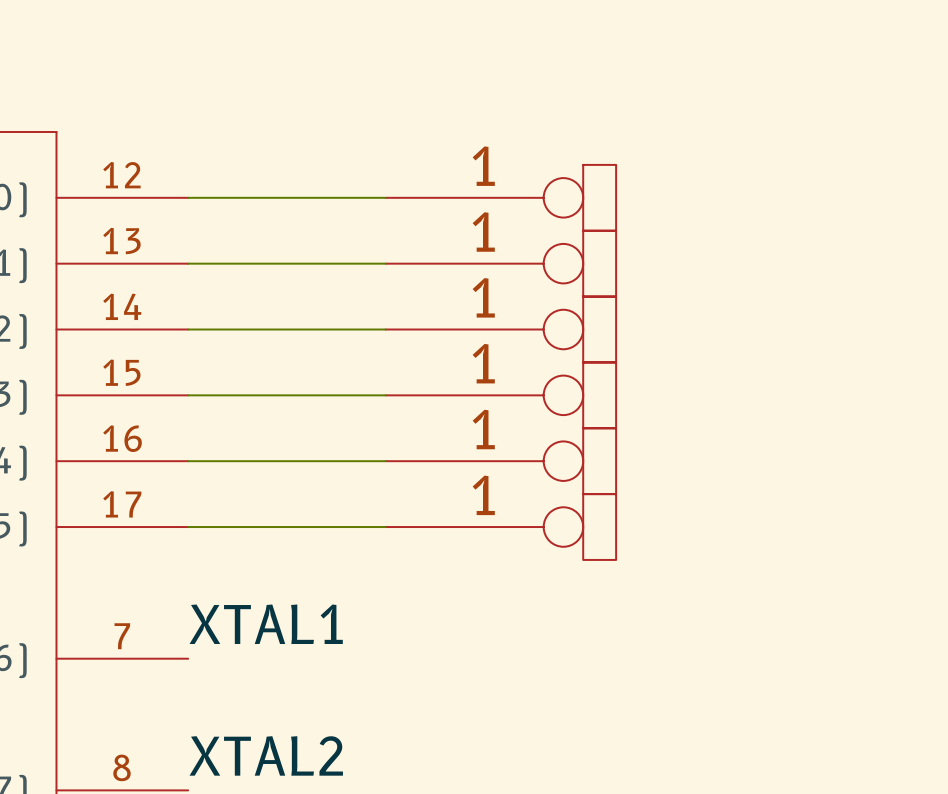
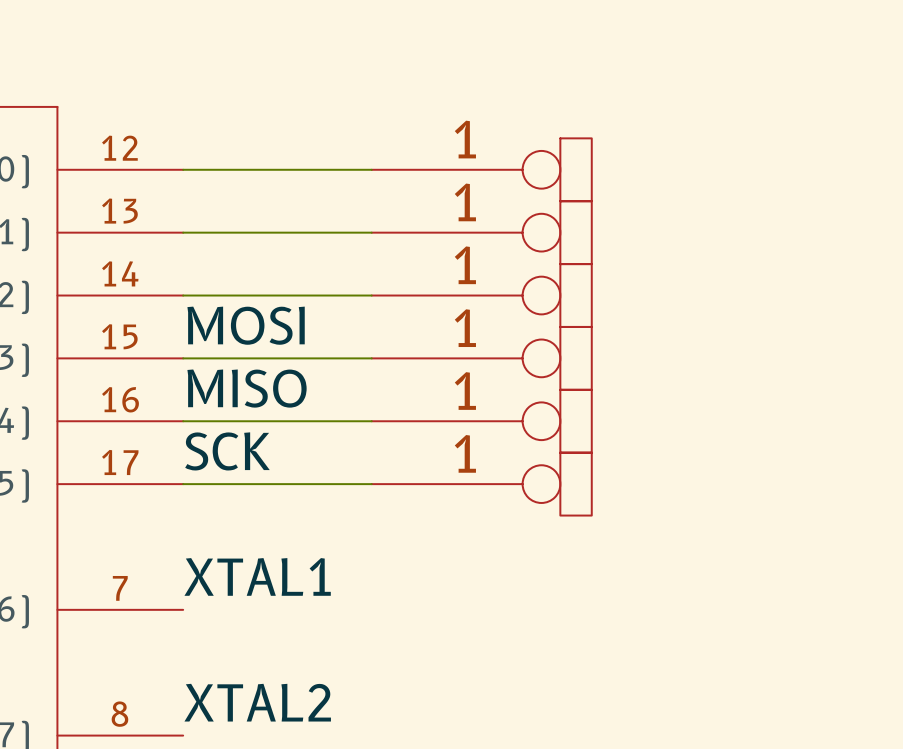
label: none -> MOSI (246, 325)
label: none -> MISO (247, 388)
label: none -> SCK (227, 451)

